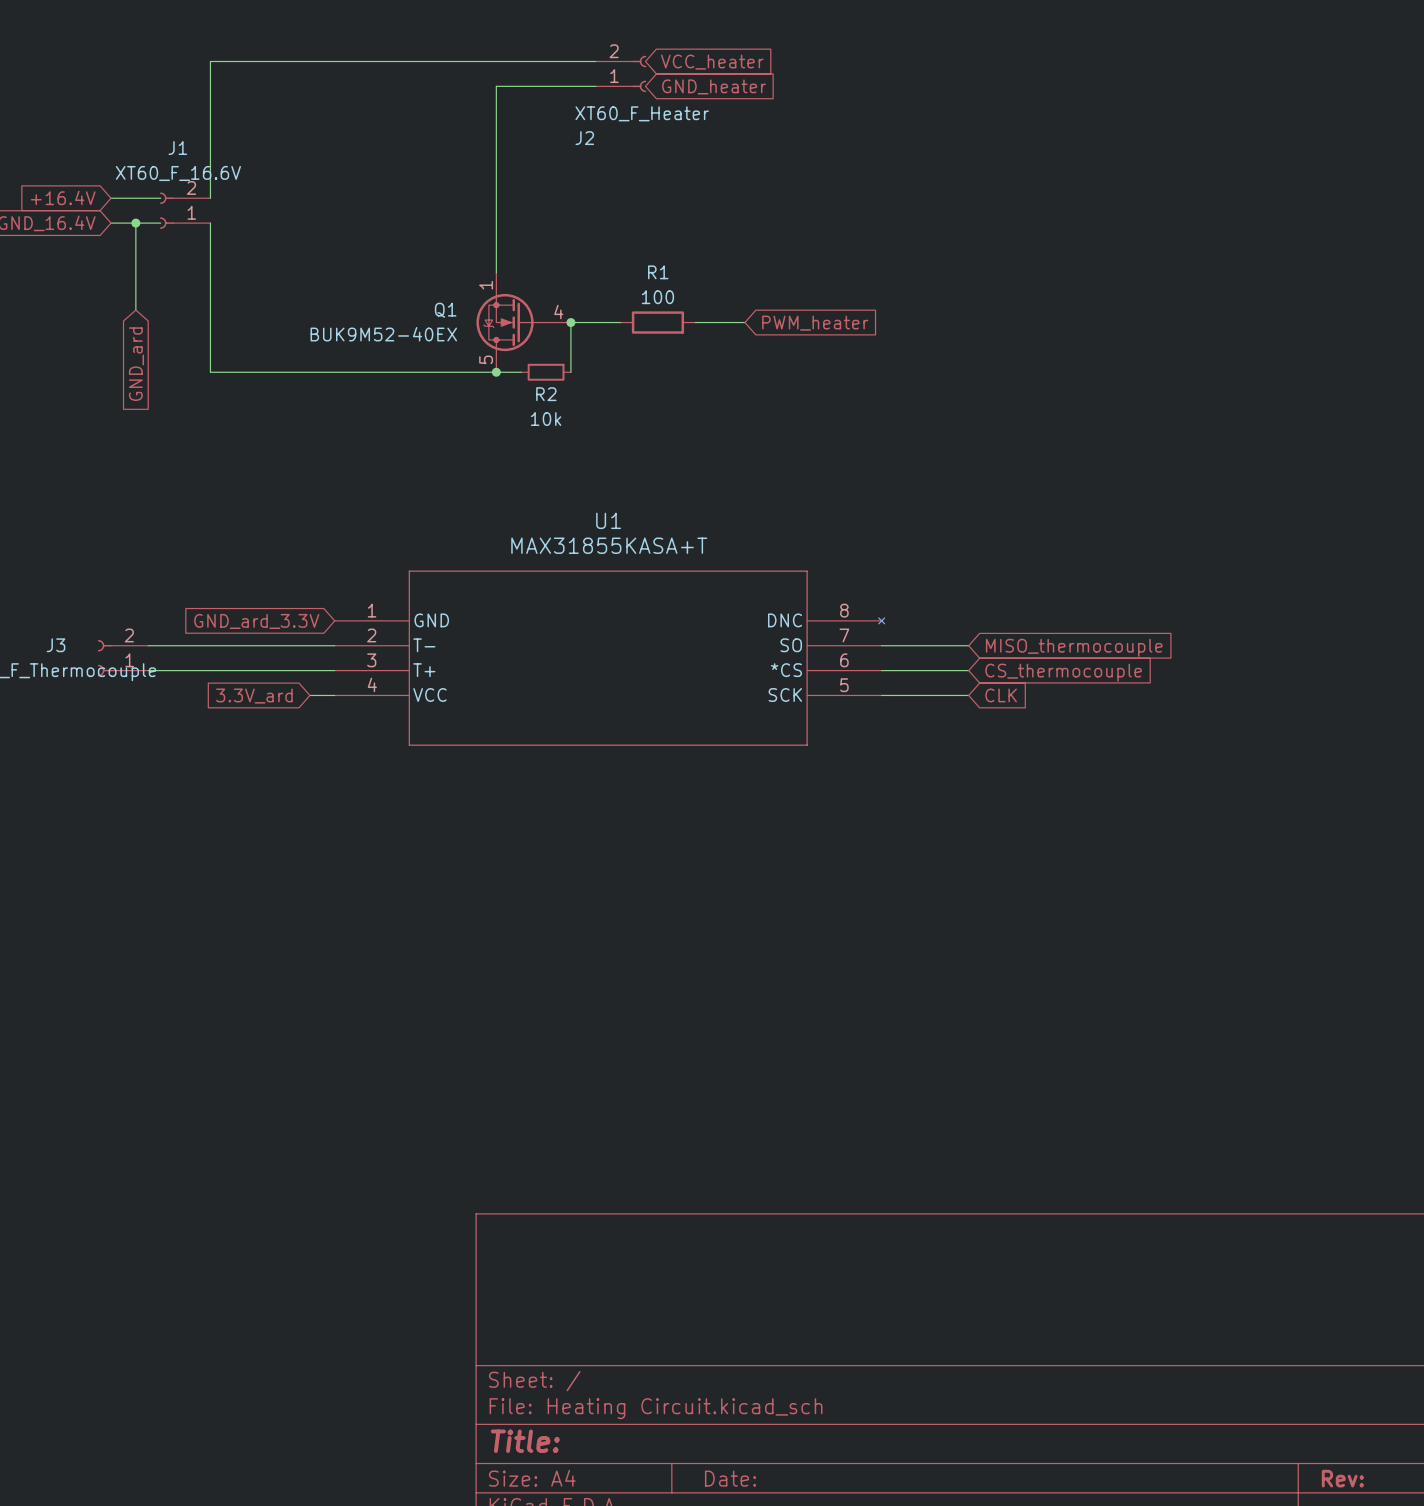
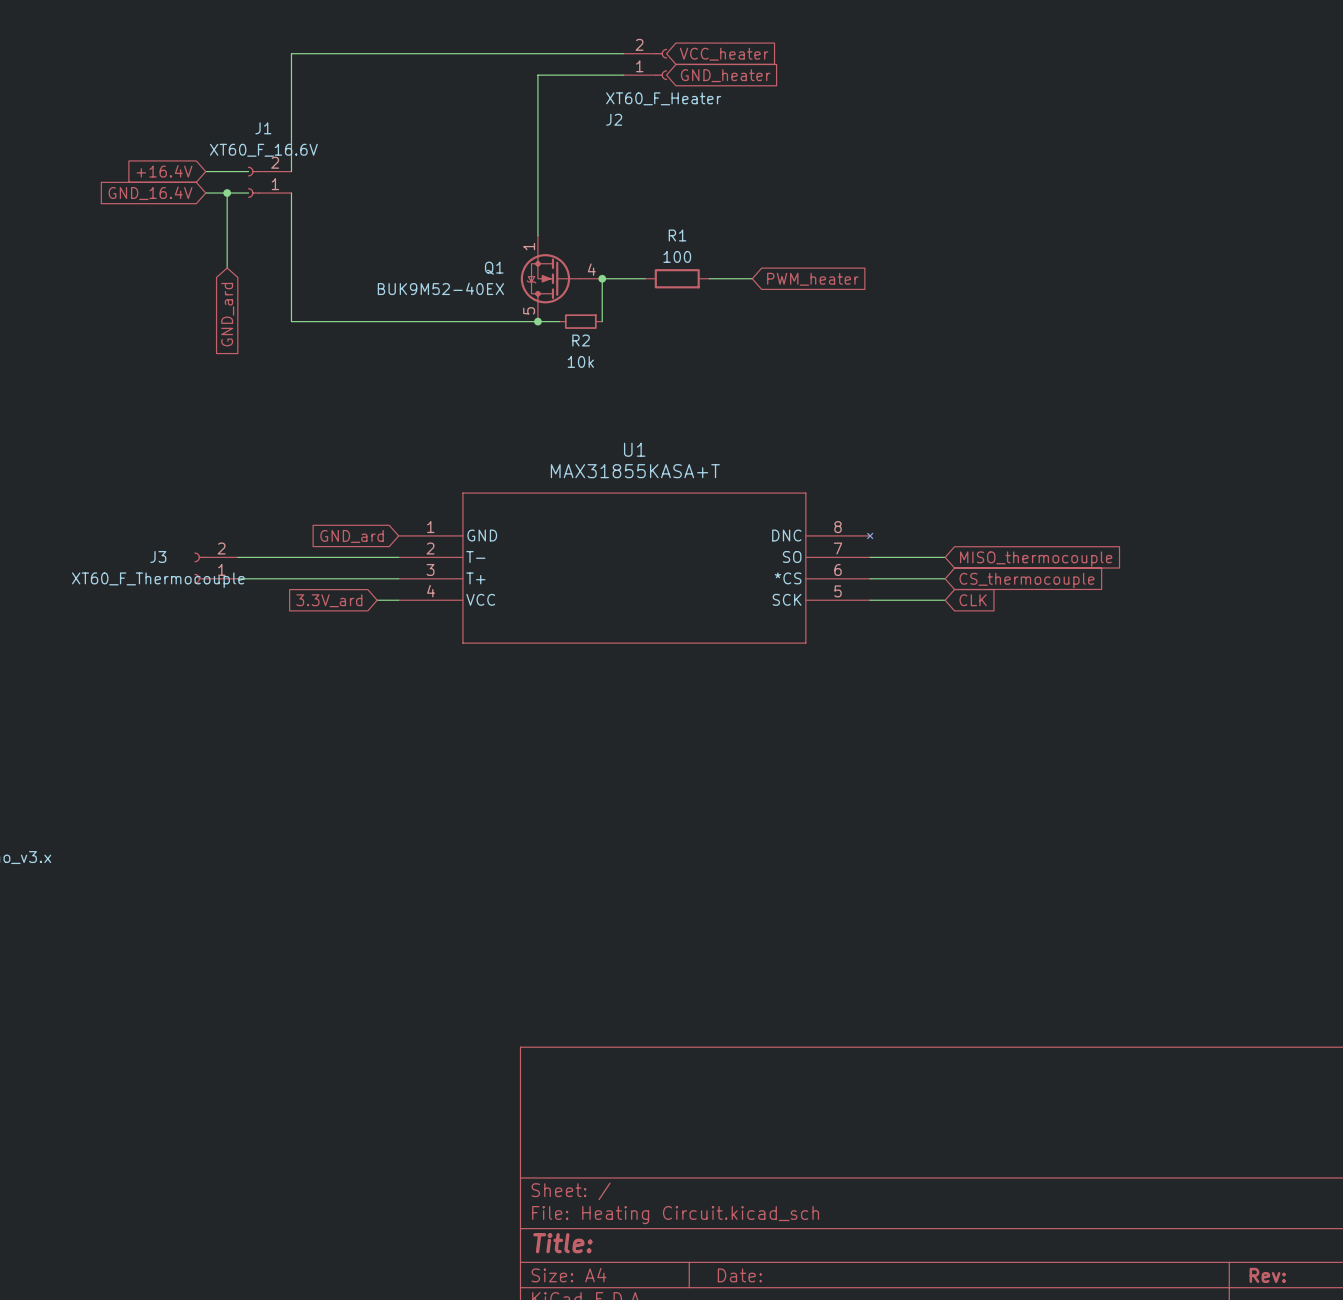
global label: GND_ard_3.3V (256, 621) -> GND_ard (352, 536)

